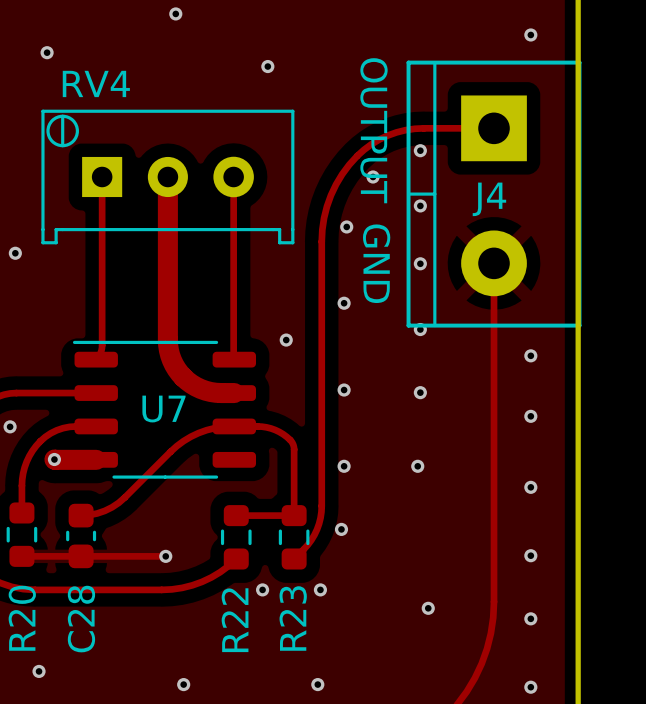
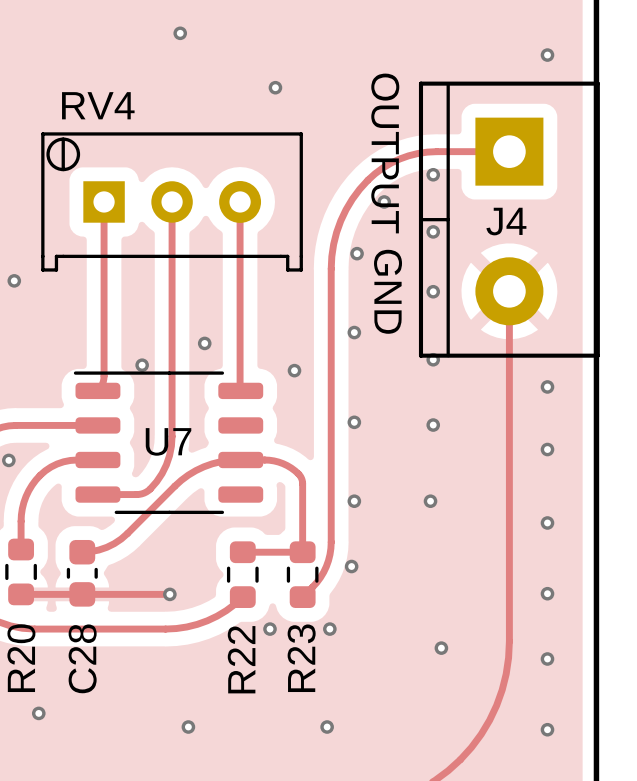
via: (47, 52) -> none
track width: thick (167, 176) (167, 339) -> thin (172, 201) (172, 370)
via: none -> (204, 343)
via: none -> (142, 365)
track: (167, 339) (168, 350) (174, 364) (187, 380) (205, 390) (234, 393) -> (172, 370) (171, 446) (162, 473) (150, 488) (141, 493) (97, 494)
track: (54, 459) (96, 459) -> none
via: (54, 459) -> none

